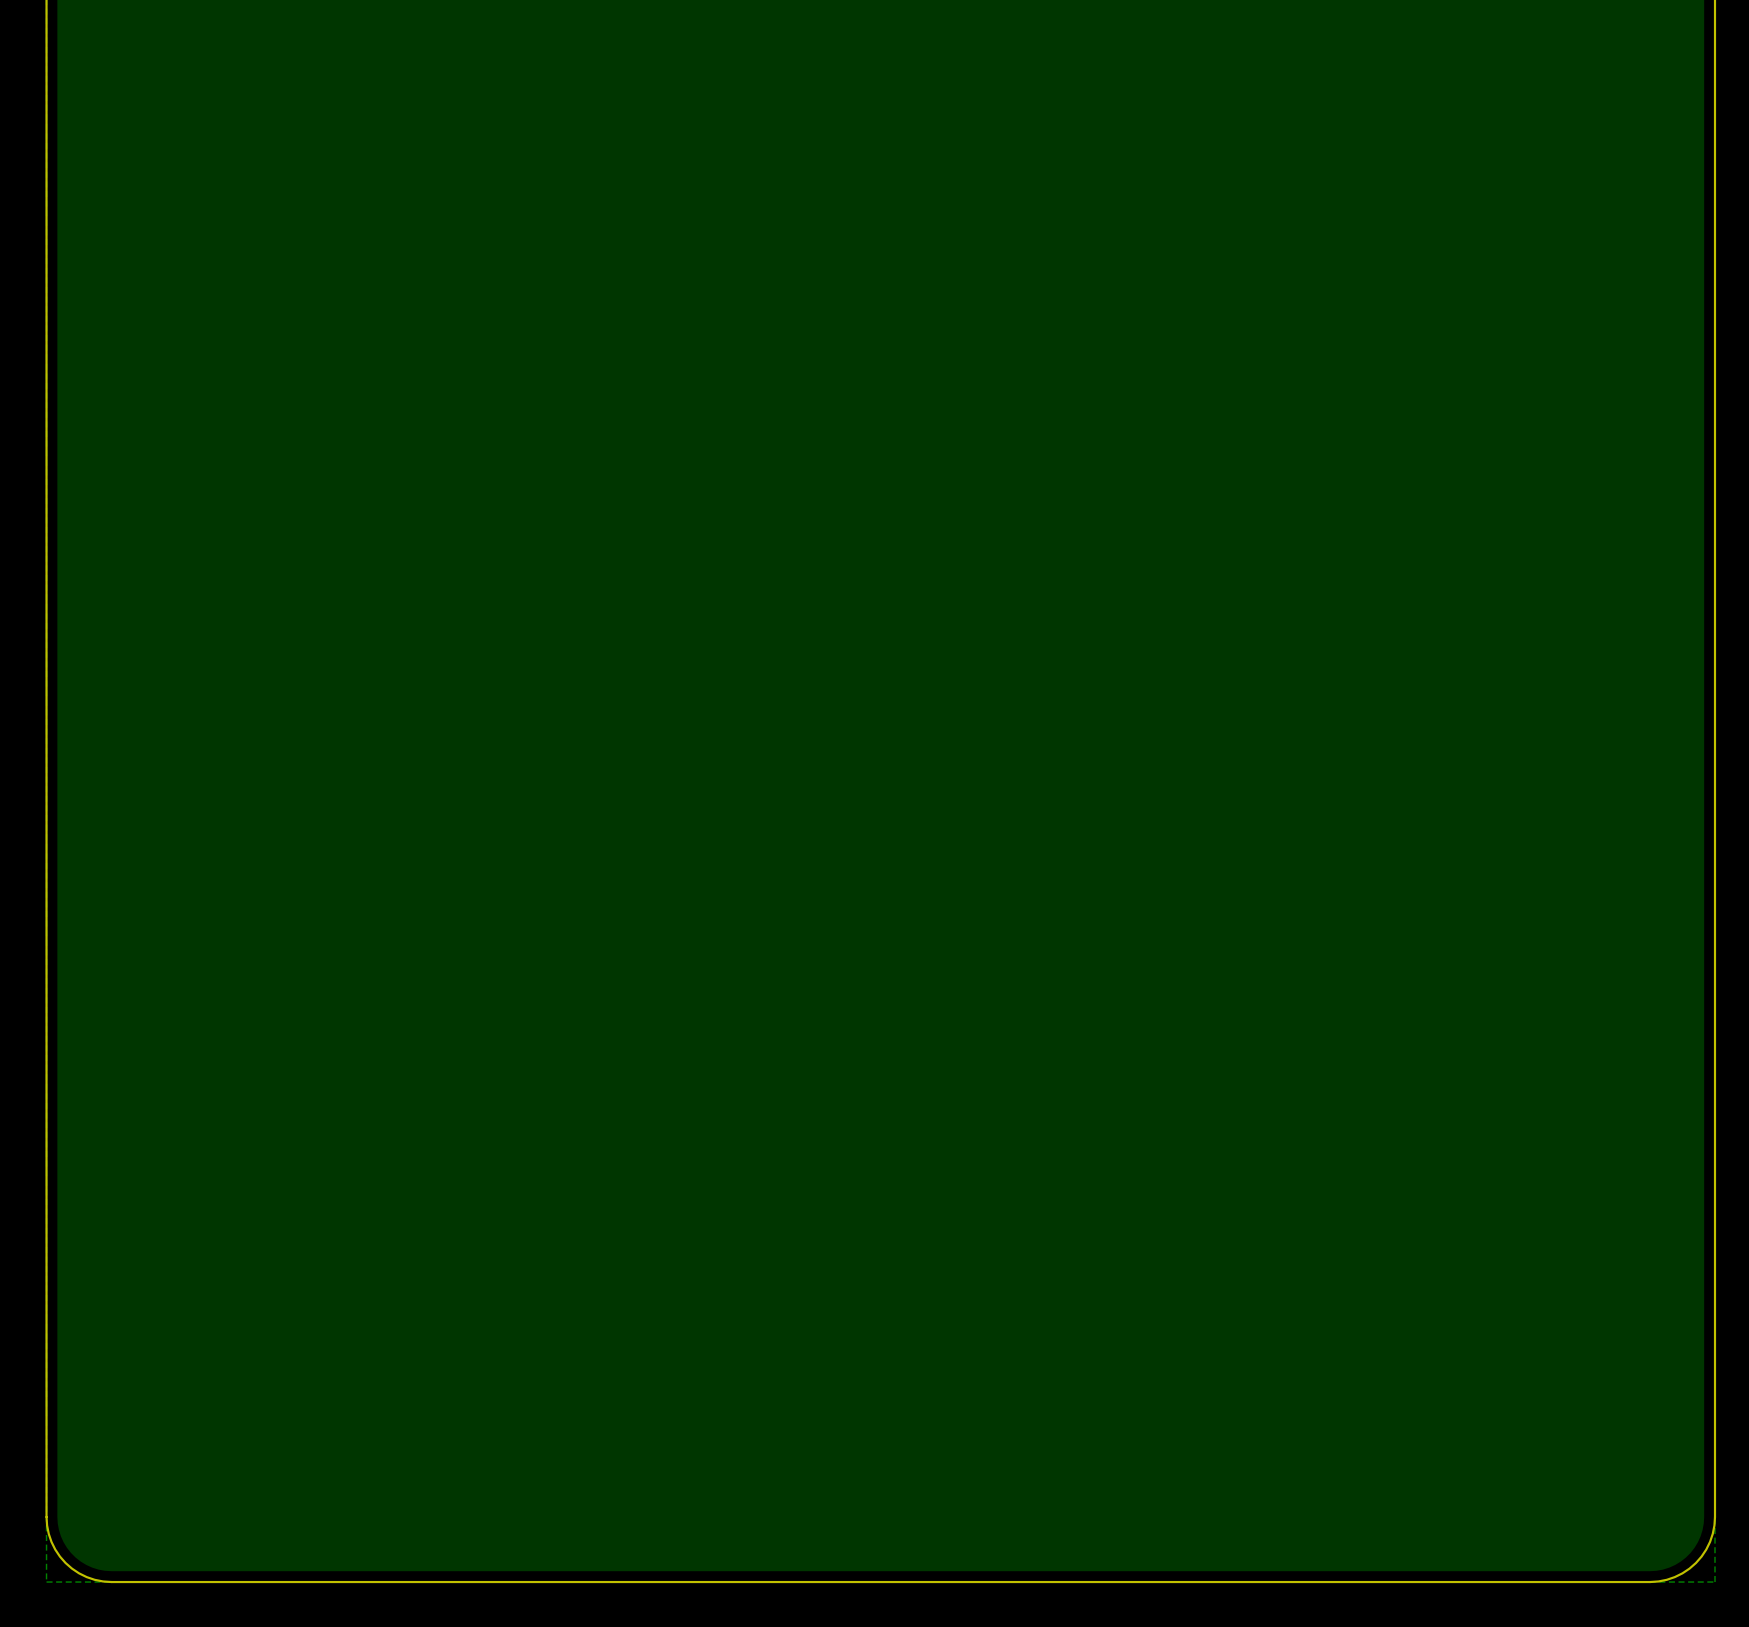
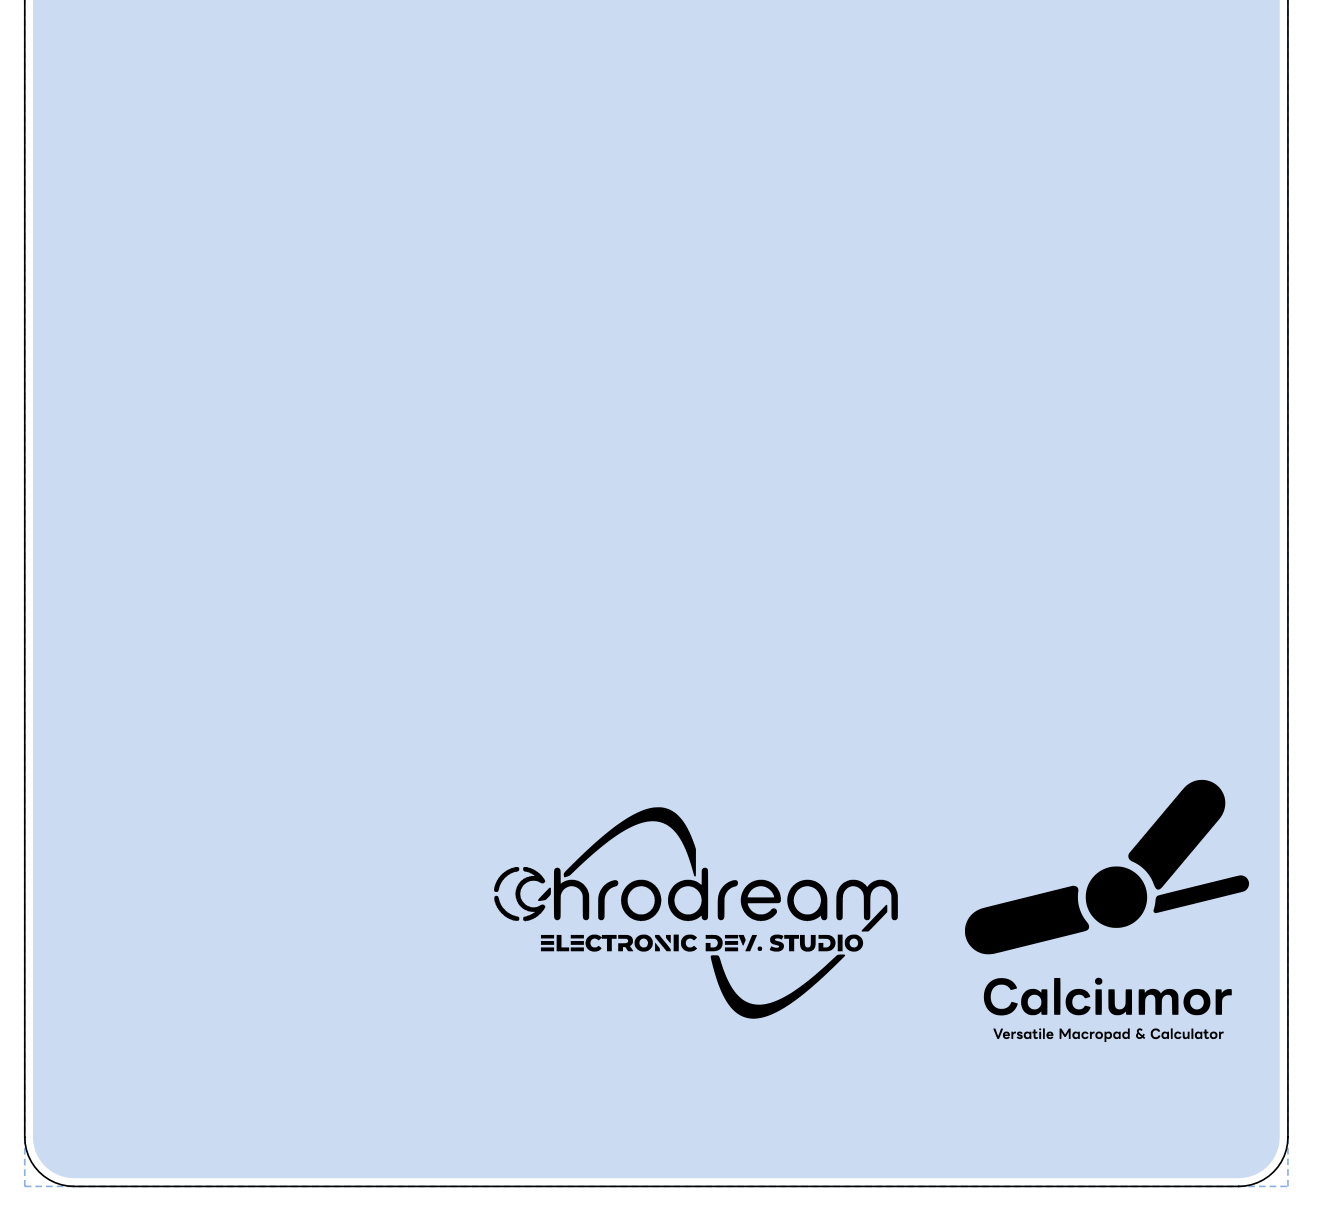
drawing: none -> [964, 779, 1250, 1043]
drawing: none -> [493, 807, 898, 1019]

